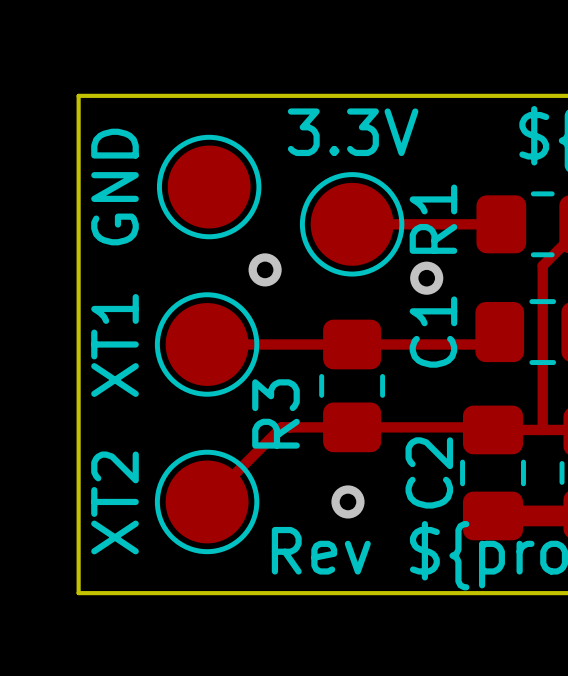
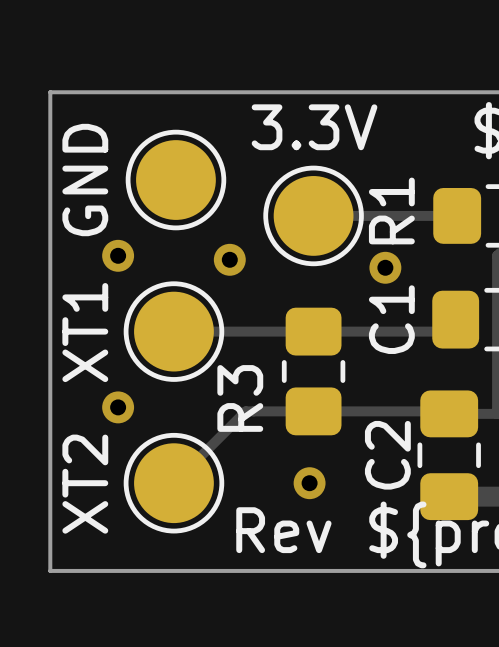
via: none -> (118, 255)
via: none -> (118, 407)

